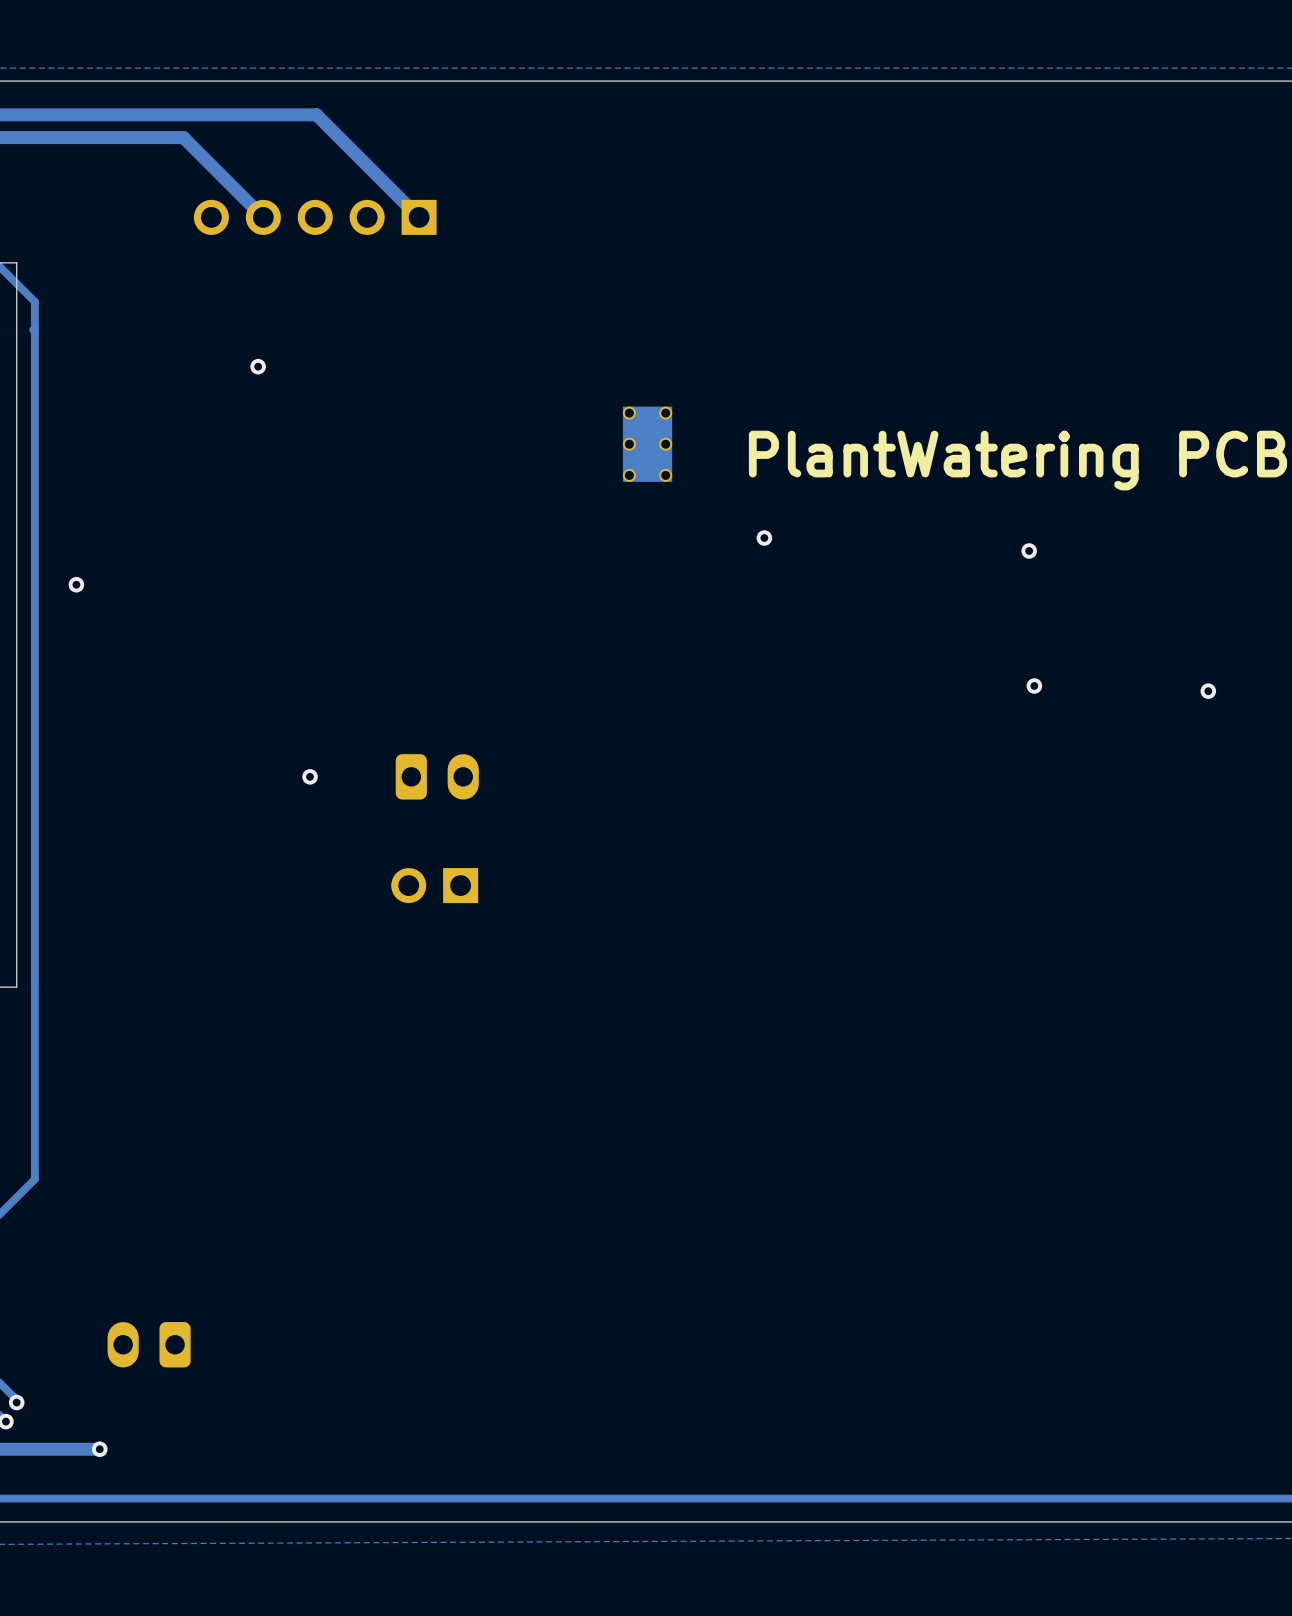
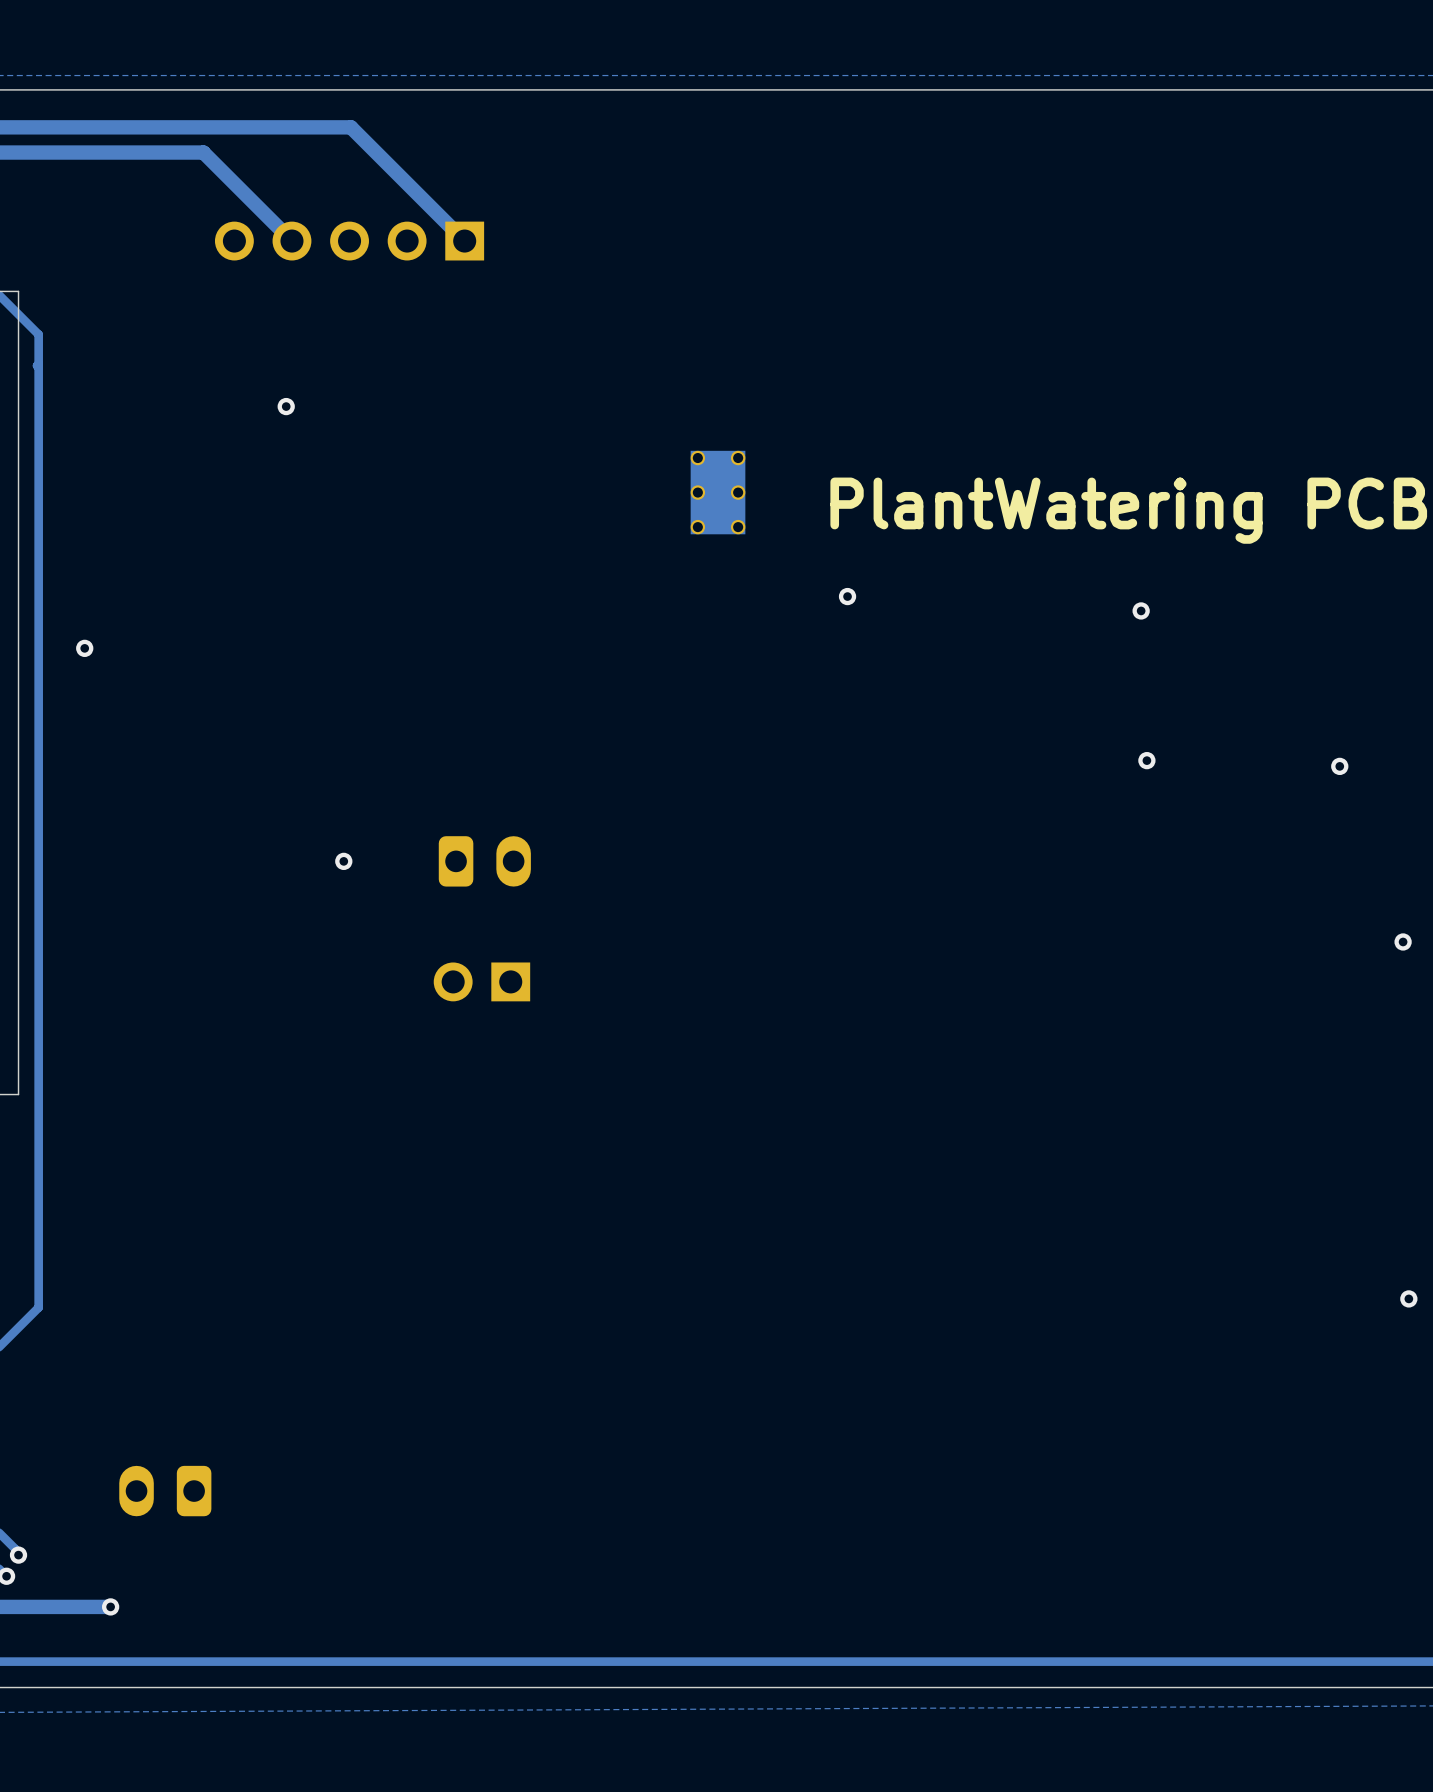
via: none -> (1403, 941)
via: none -> (1408, 1298)

